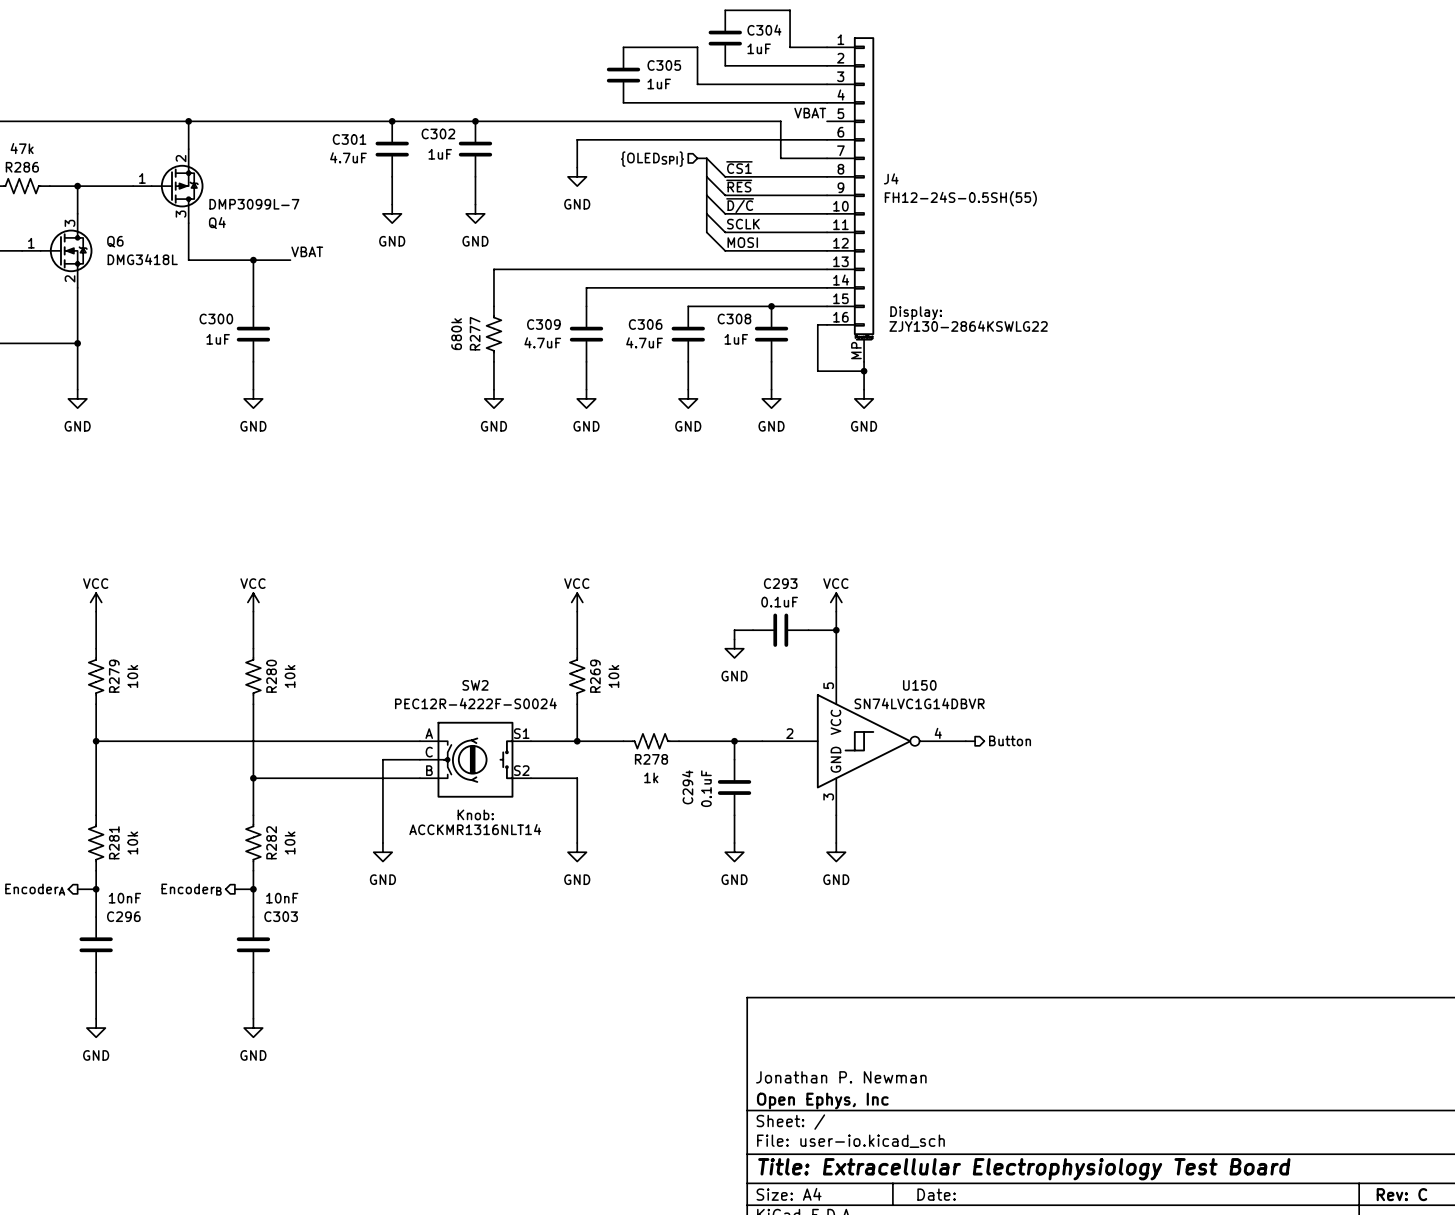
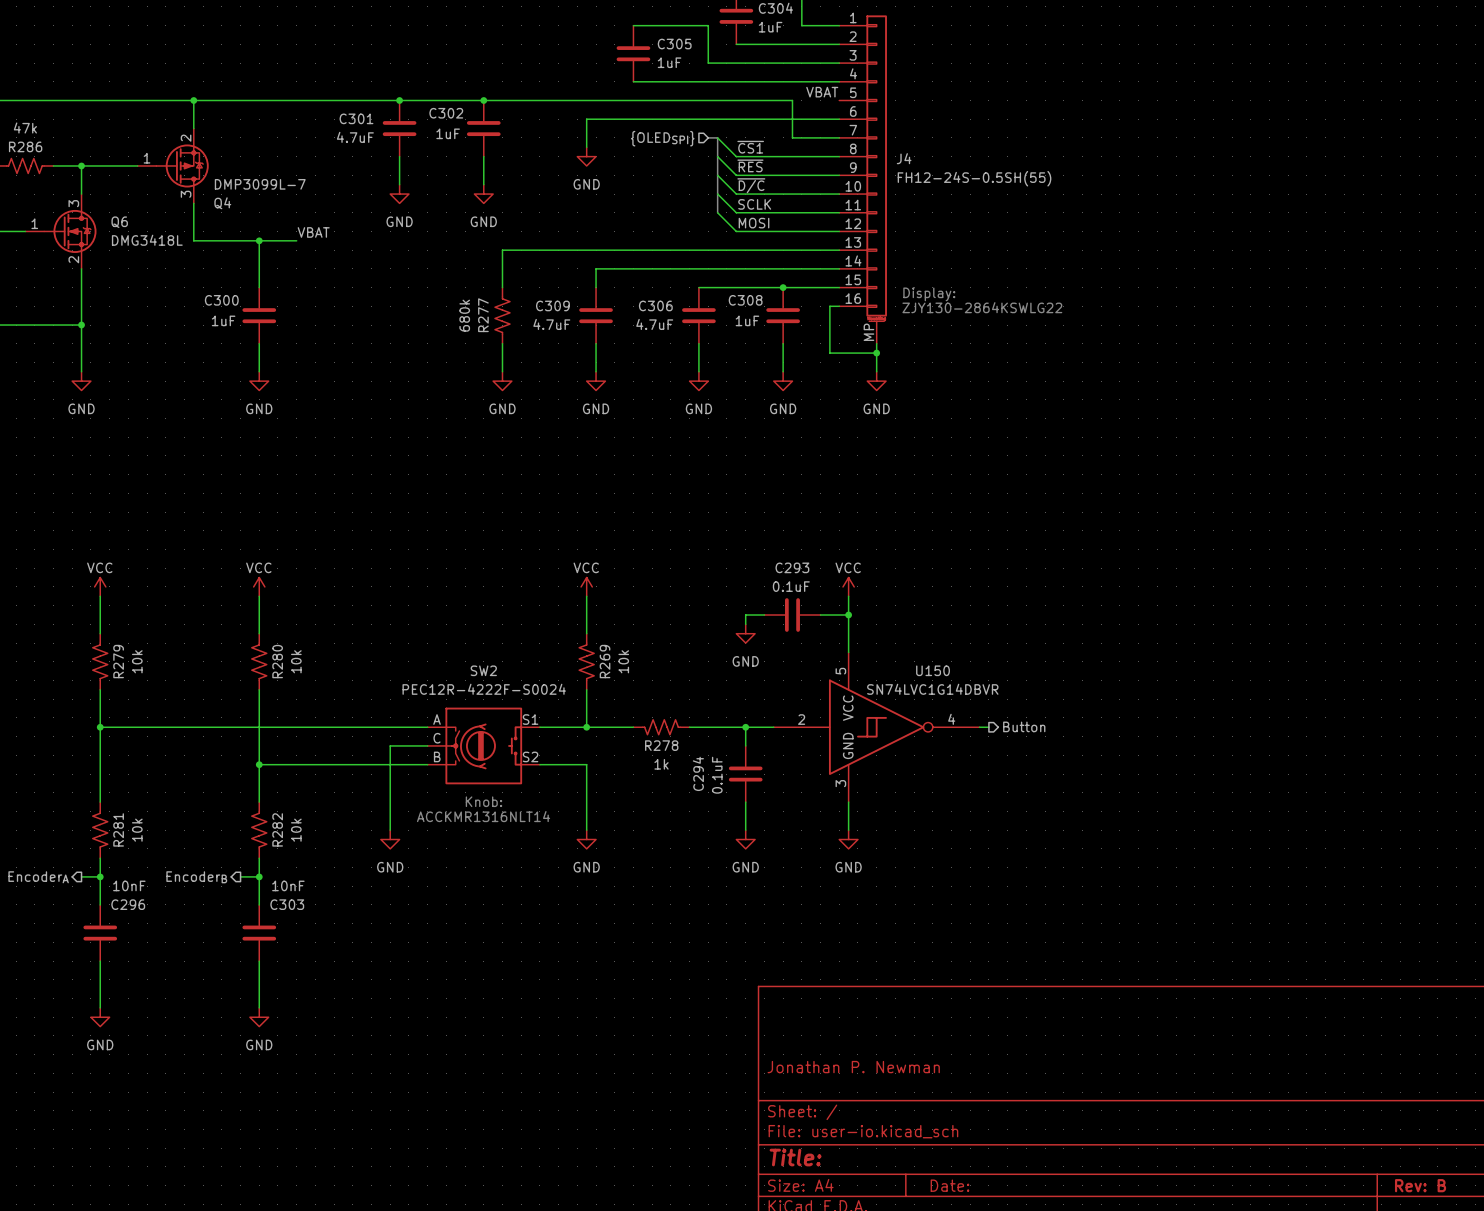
title block: Open Ephys, Inc (822, 1101) -> none
title block: Title: Extracellular Electrophysiology Test Board (1024, 1169) -> Title: (795, 1157)
title block: Rev: C (1401, 1194) -> Rev: B (1420, 1185)

